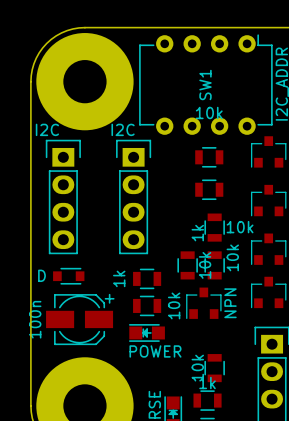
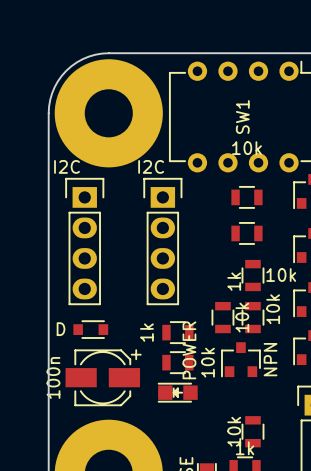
part value rotation: 0° (155, 351) -> 90° counterclockwise (189, 350)

